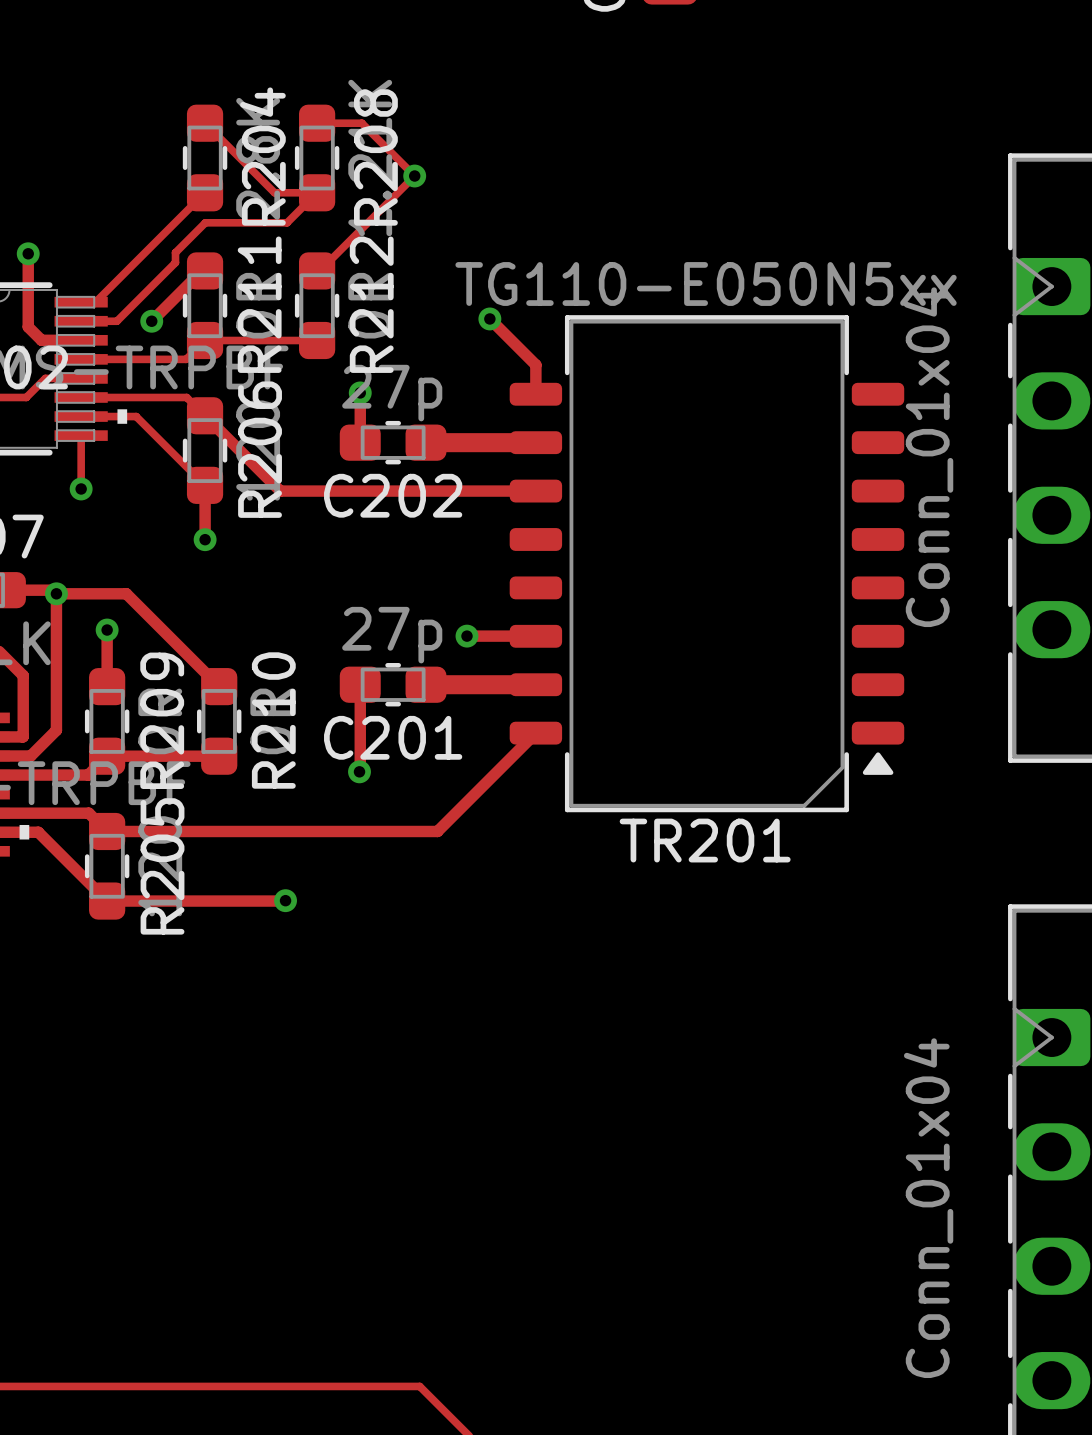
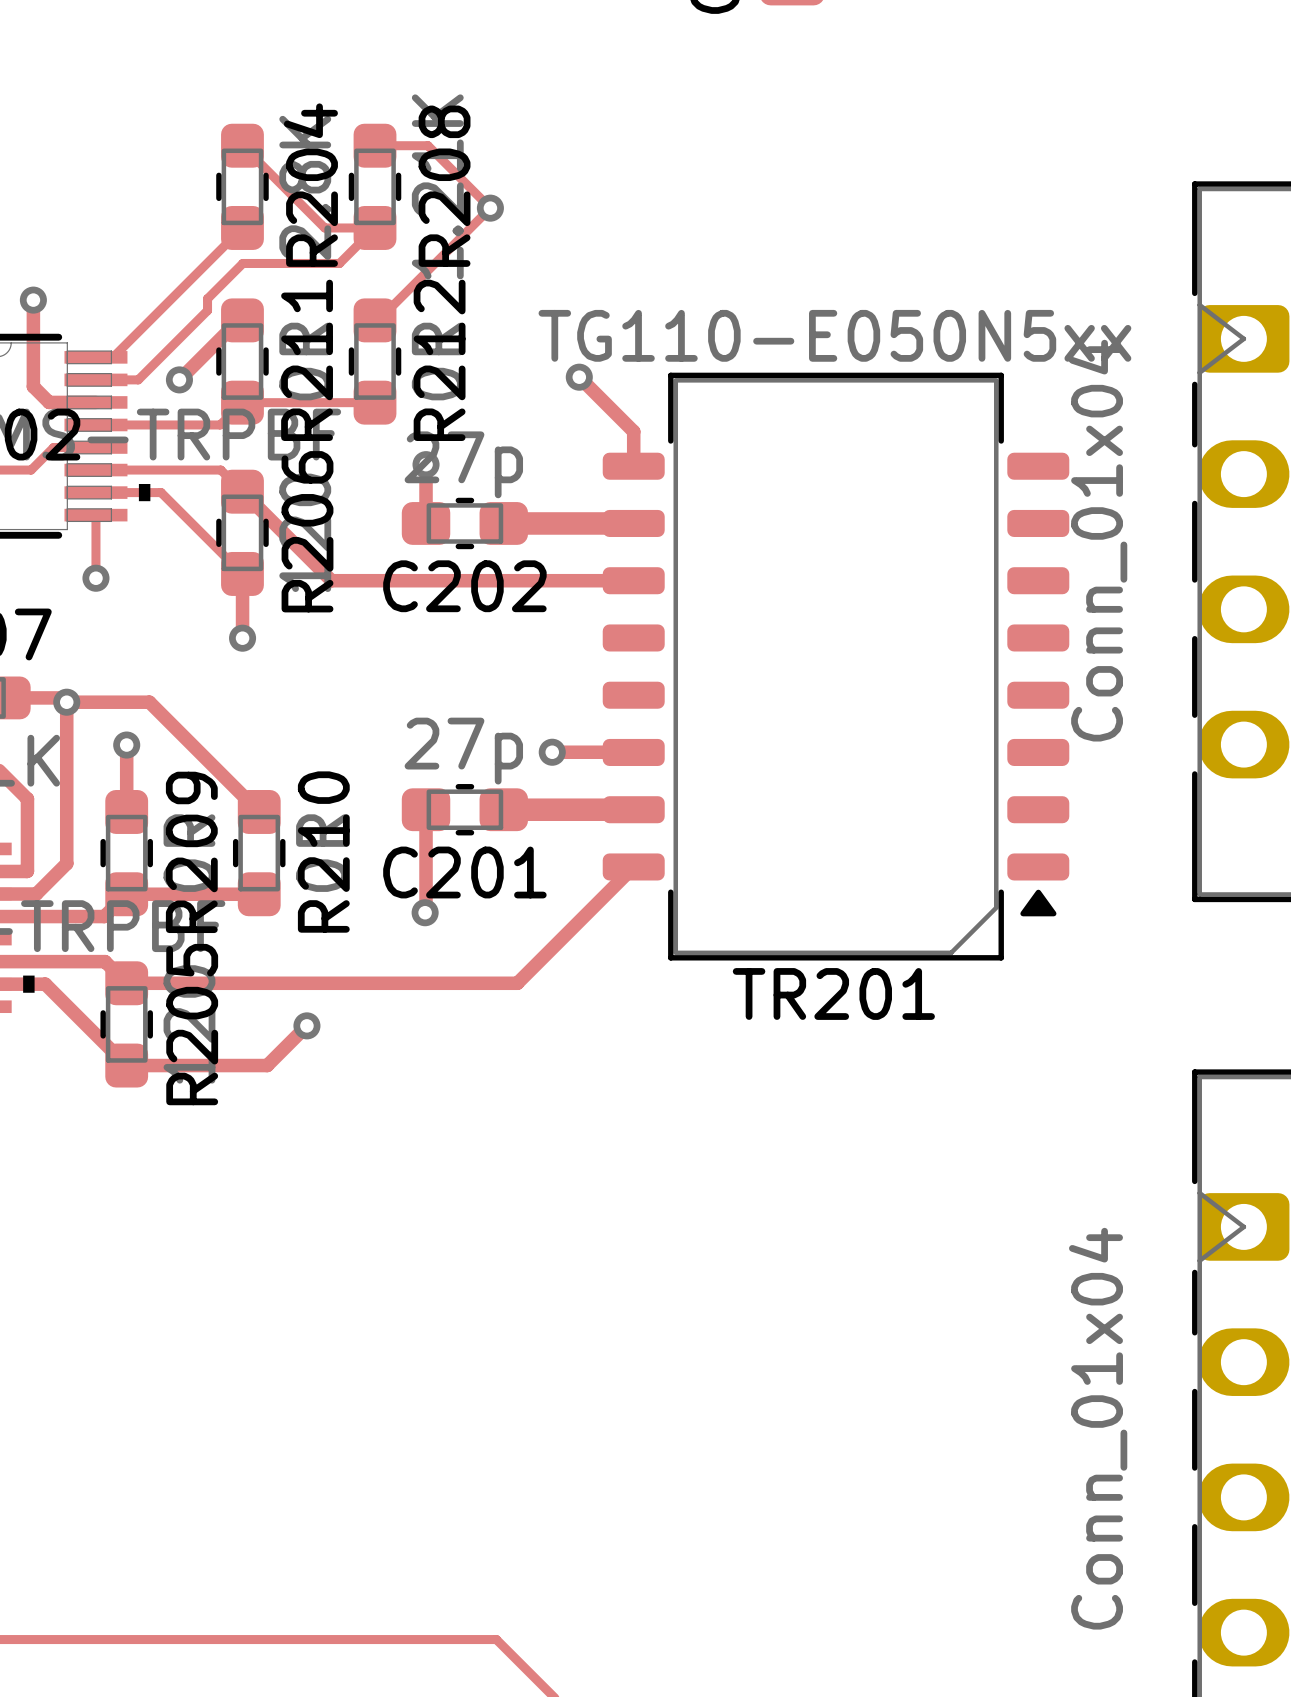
via position: (285, 900) -> (306, 1025)
track: (226, 901) (285, 901) -> (267, 1065) (306, 1025)

